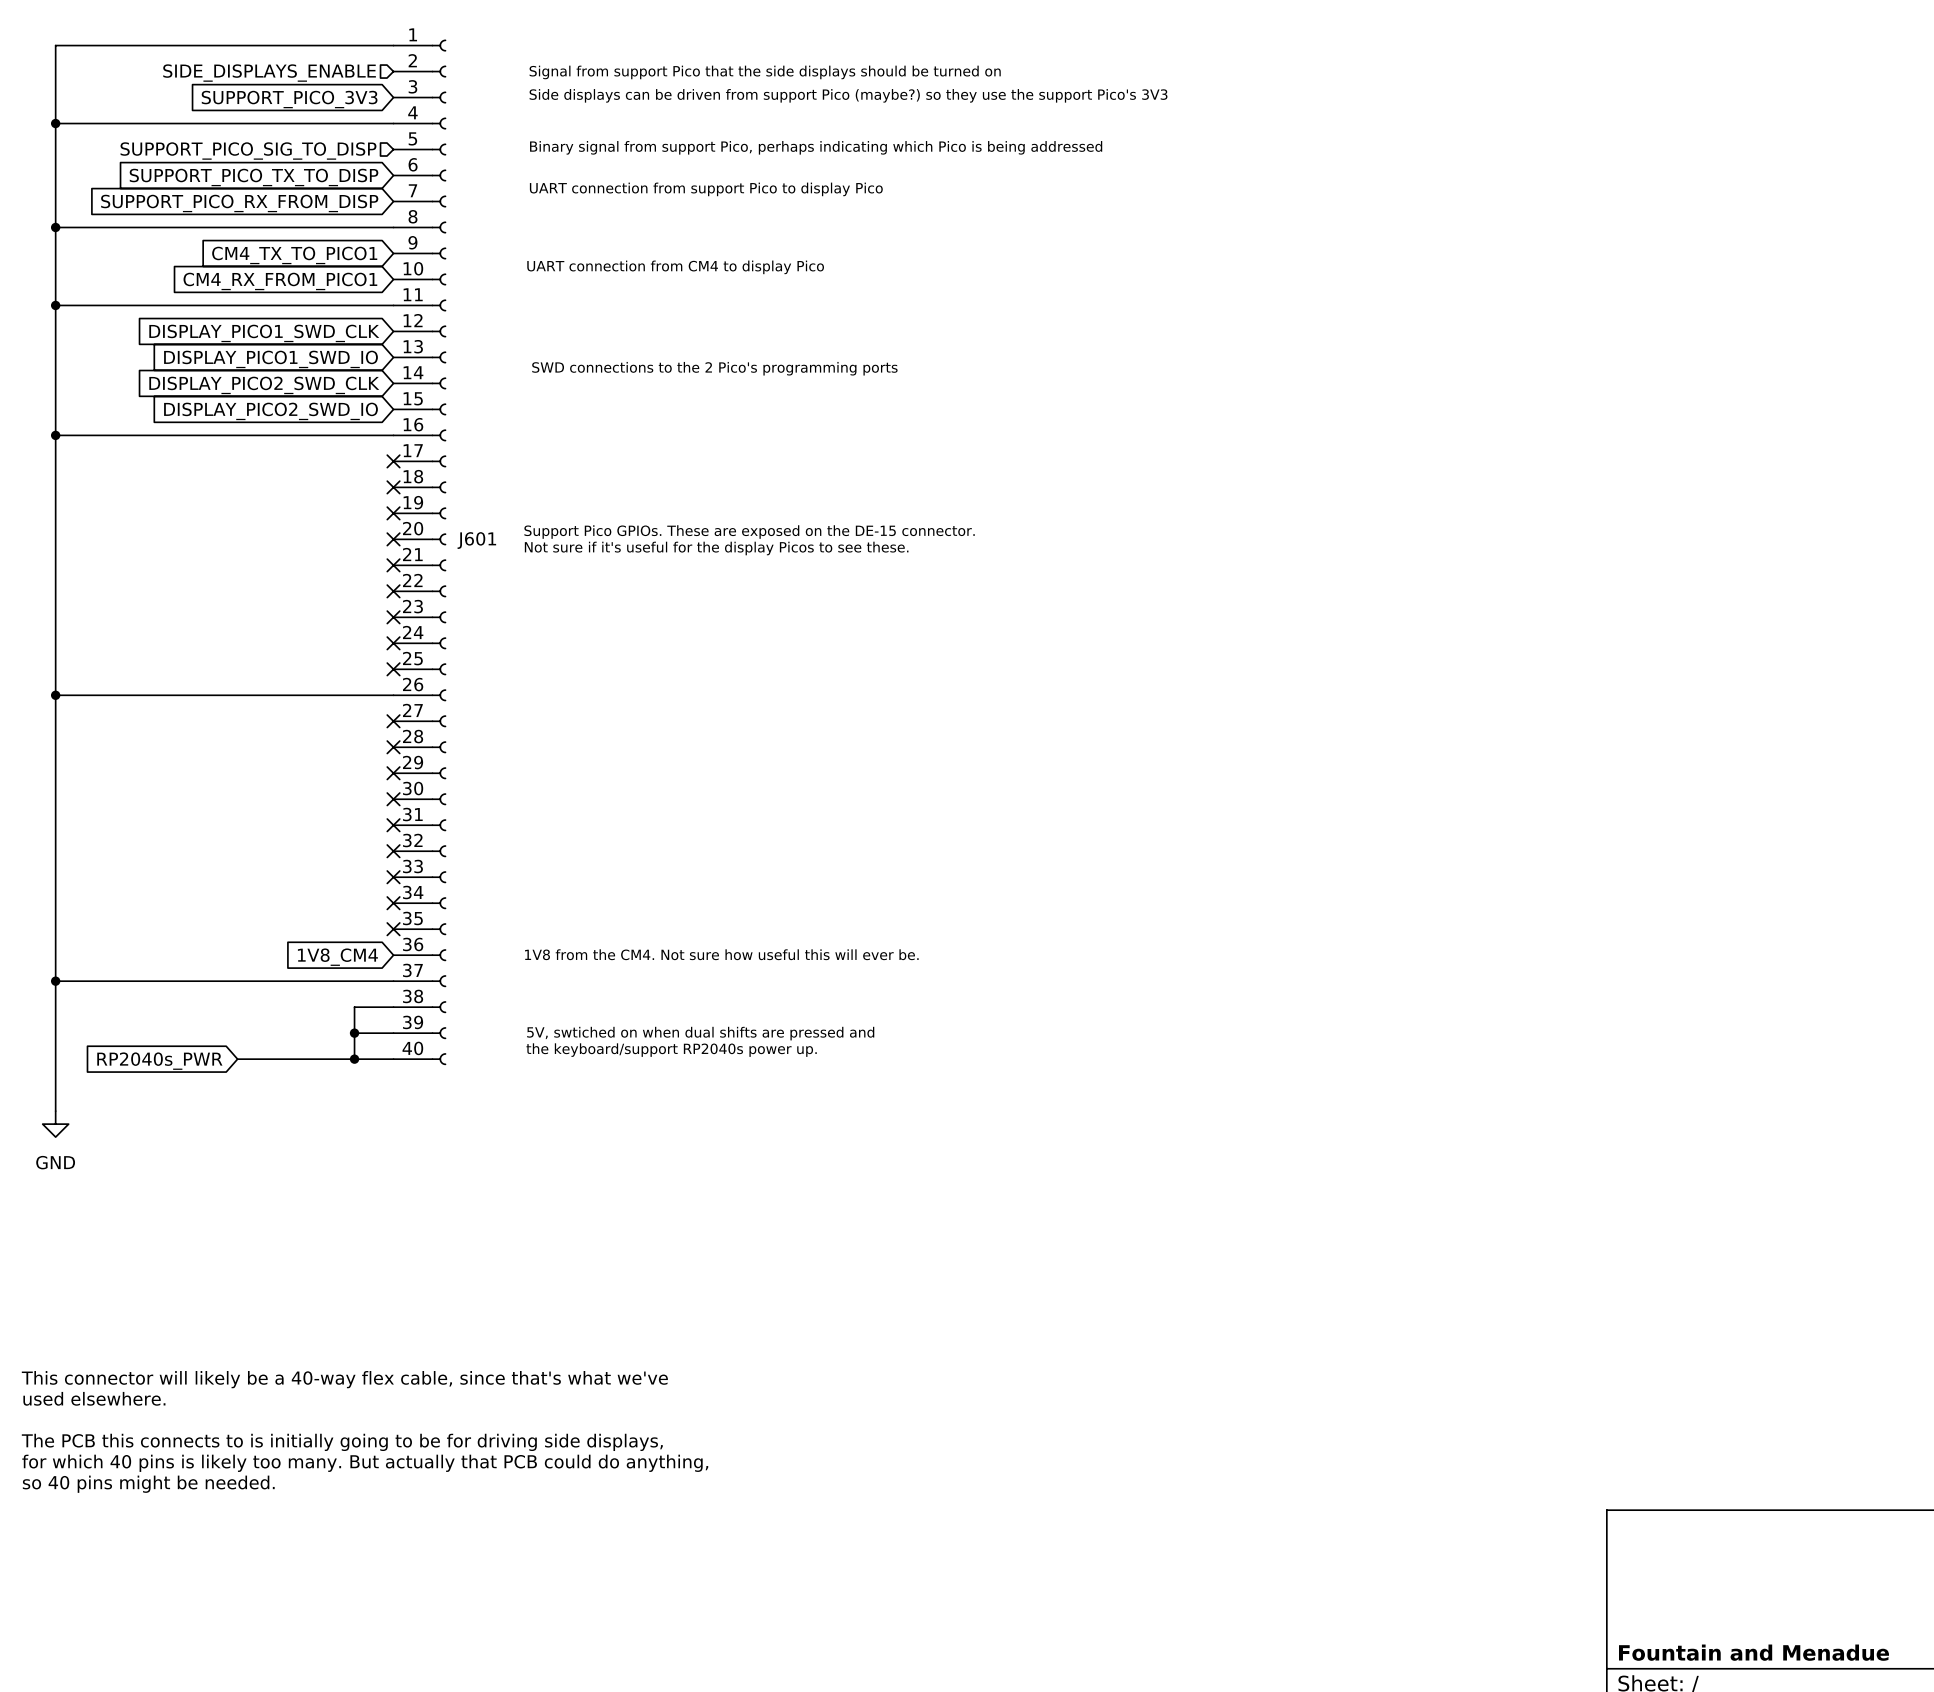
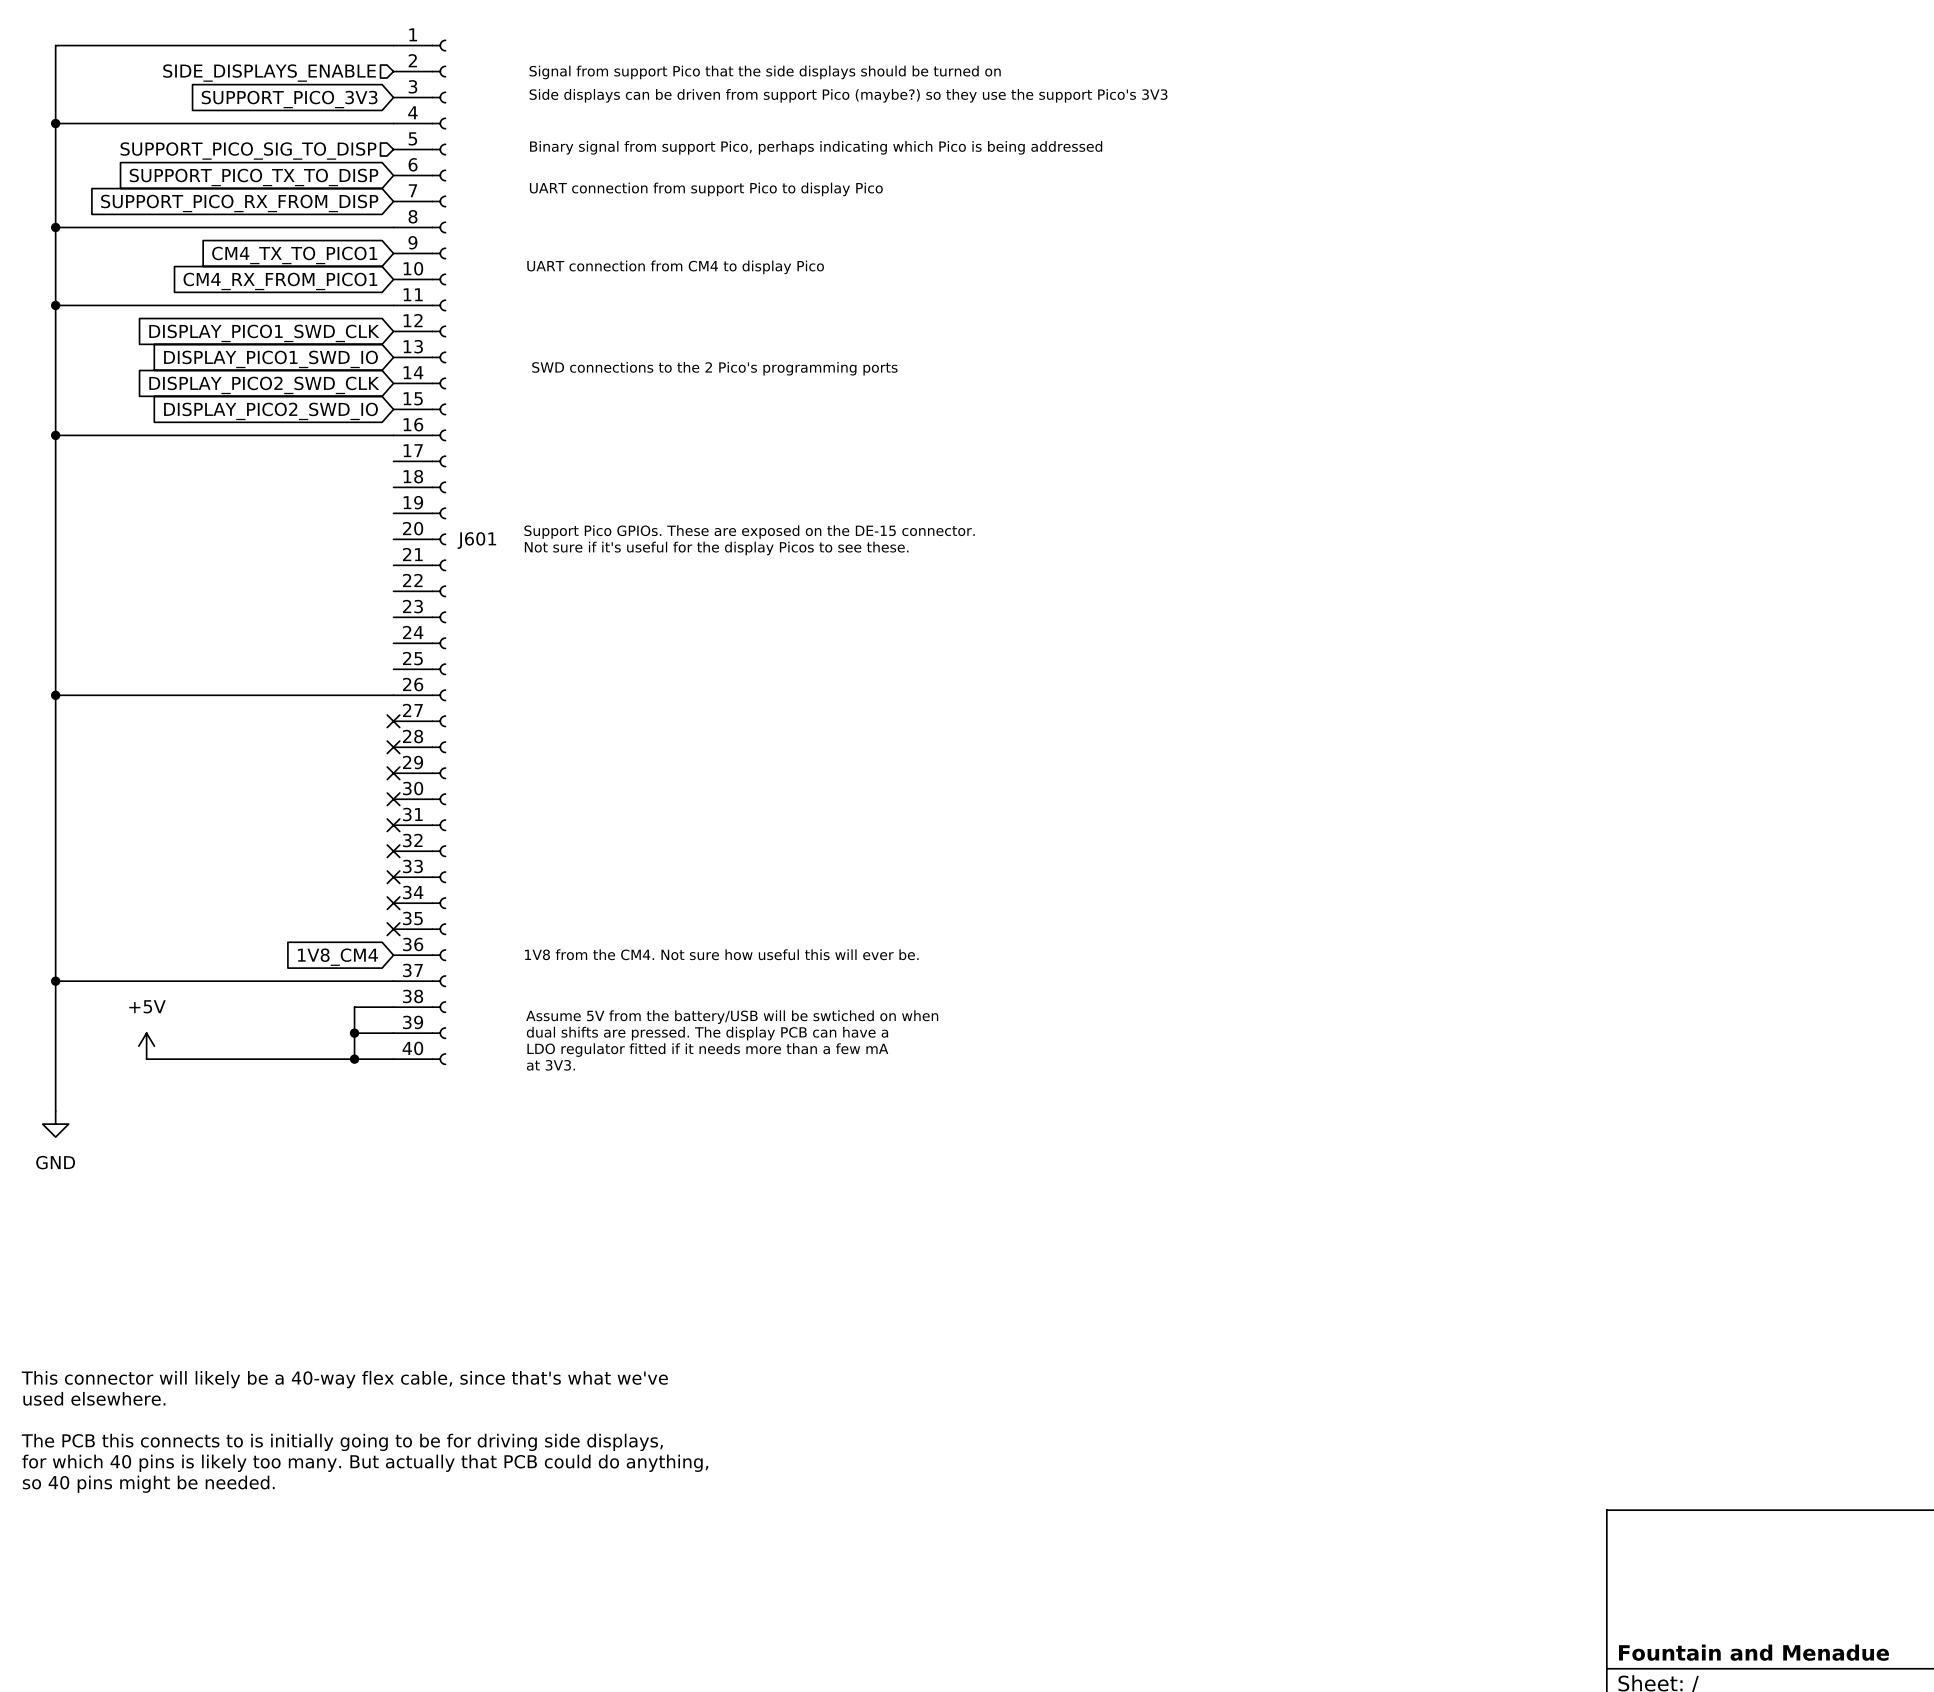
no-connect mark: (393, 461) -> none
no-connect mark: (393, 487) -> none
no-connect mark: (393, 513) -> none
no-connect mark: (393, 539) -> none
no-connect mark: (393, 565) -> none
no-connect mark: (393, 591) -> none
no-connect mark: (393, 617) -> none
no-connect mark: (393, 643) -> none
no-connect mark: (393, 669) -> none
text: none -> Assume 5V from the battery/USB will be swtiched on when (732, 1017)
text: 5V, swtiched on when dual shifts are pressed and (700, 1033) -> dual shifts are pressed. The display PCB can have a (707, 1033)
power symbol: none -> +5V (146, 1046)
text: the keyboard/support RP2040s power up. (671, 1050) -> LDO regulator fitted if it needs more than a few mA (707, 1050)
wire: none -> (146, 1059) (237, 1059)
global label: RP2040s_PWR (159, 1061) -> none
text: none -> at 3V3. (550, 1065)

